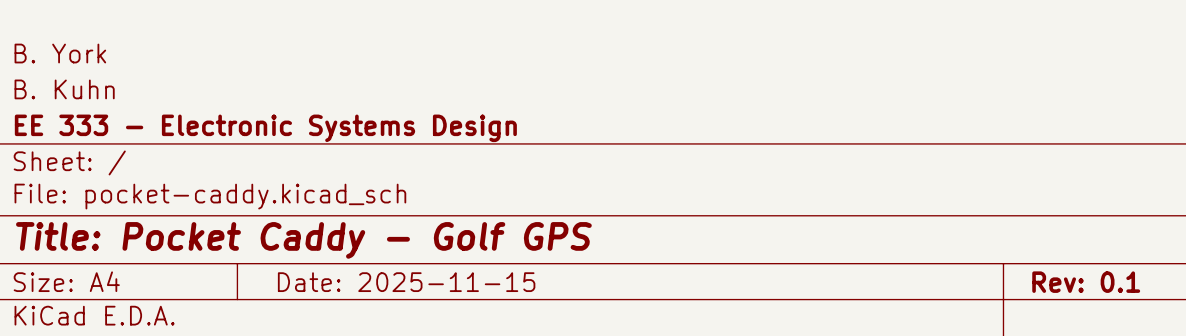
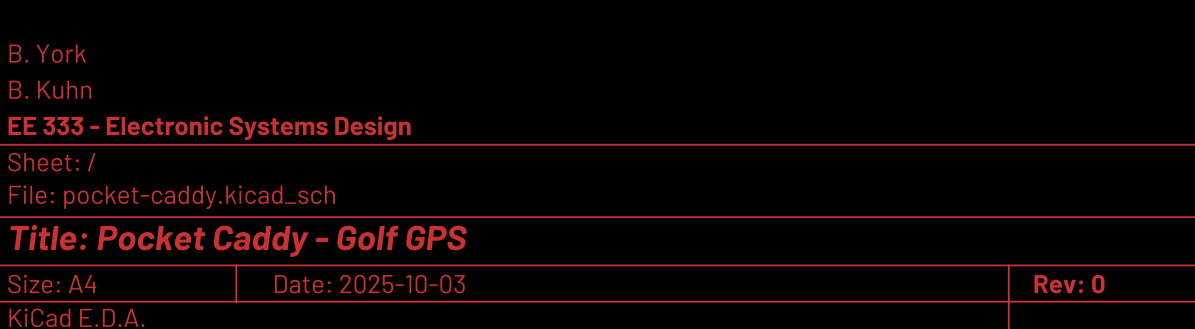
title block: Date: 2025-11-15 (406, 282) -> Date: 2025-10-03 (369, 284)
title block: Rev: 0.1 (1086, 282) -> Rev: 0 (1069, 284)

